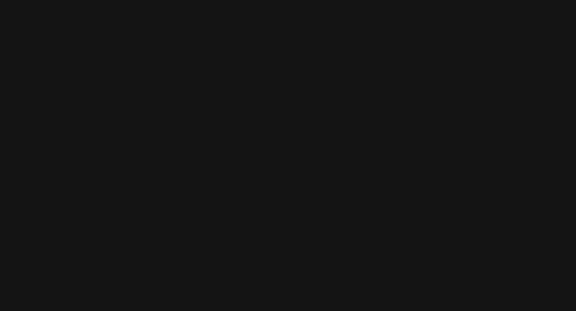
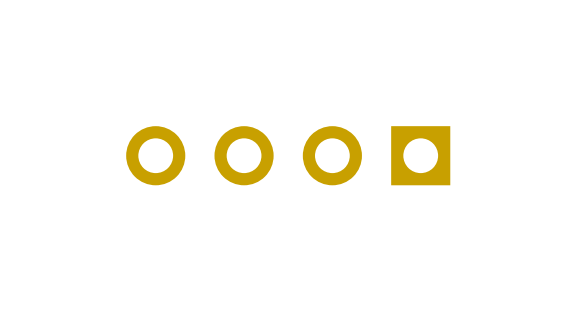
part: none -> (288, 155)

